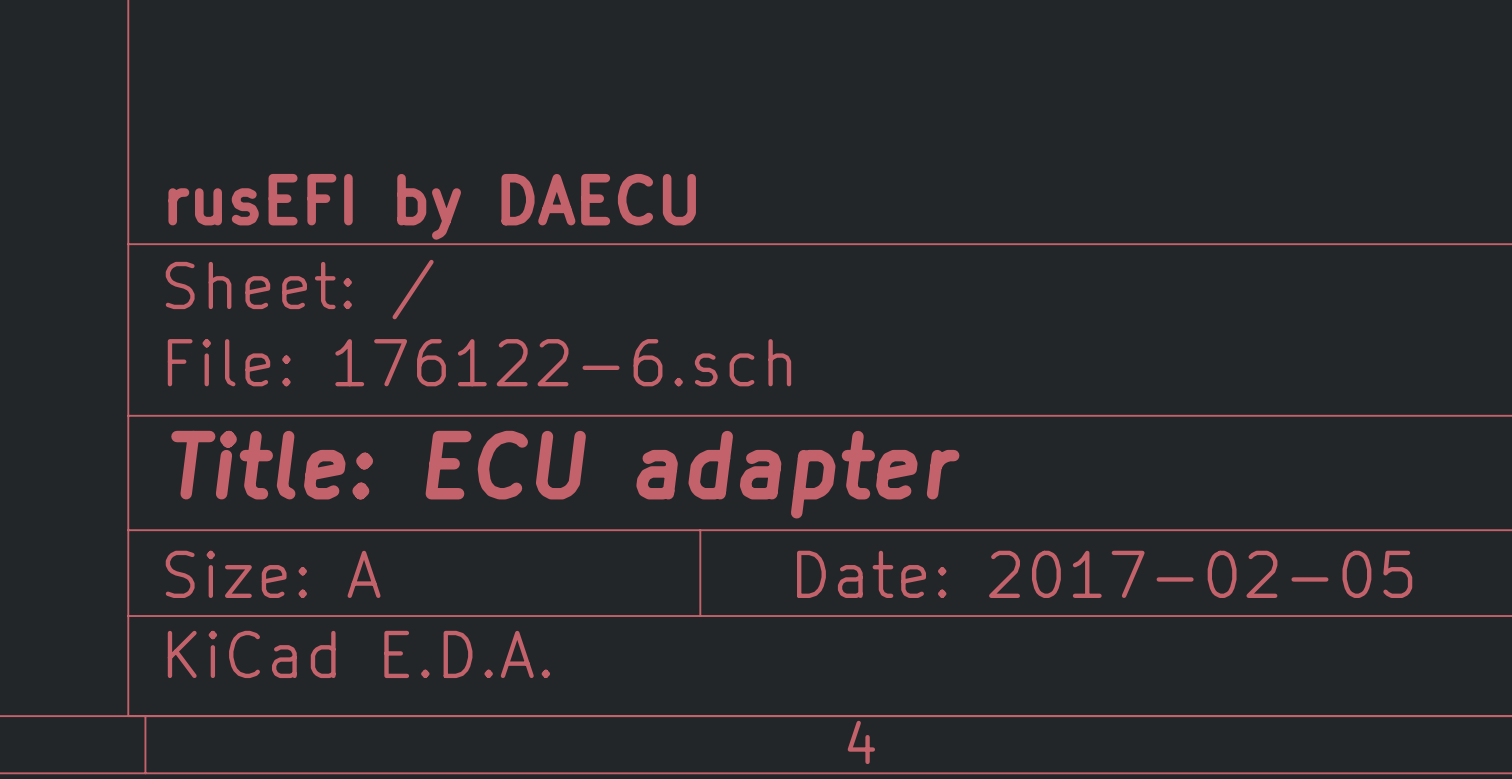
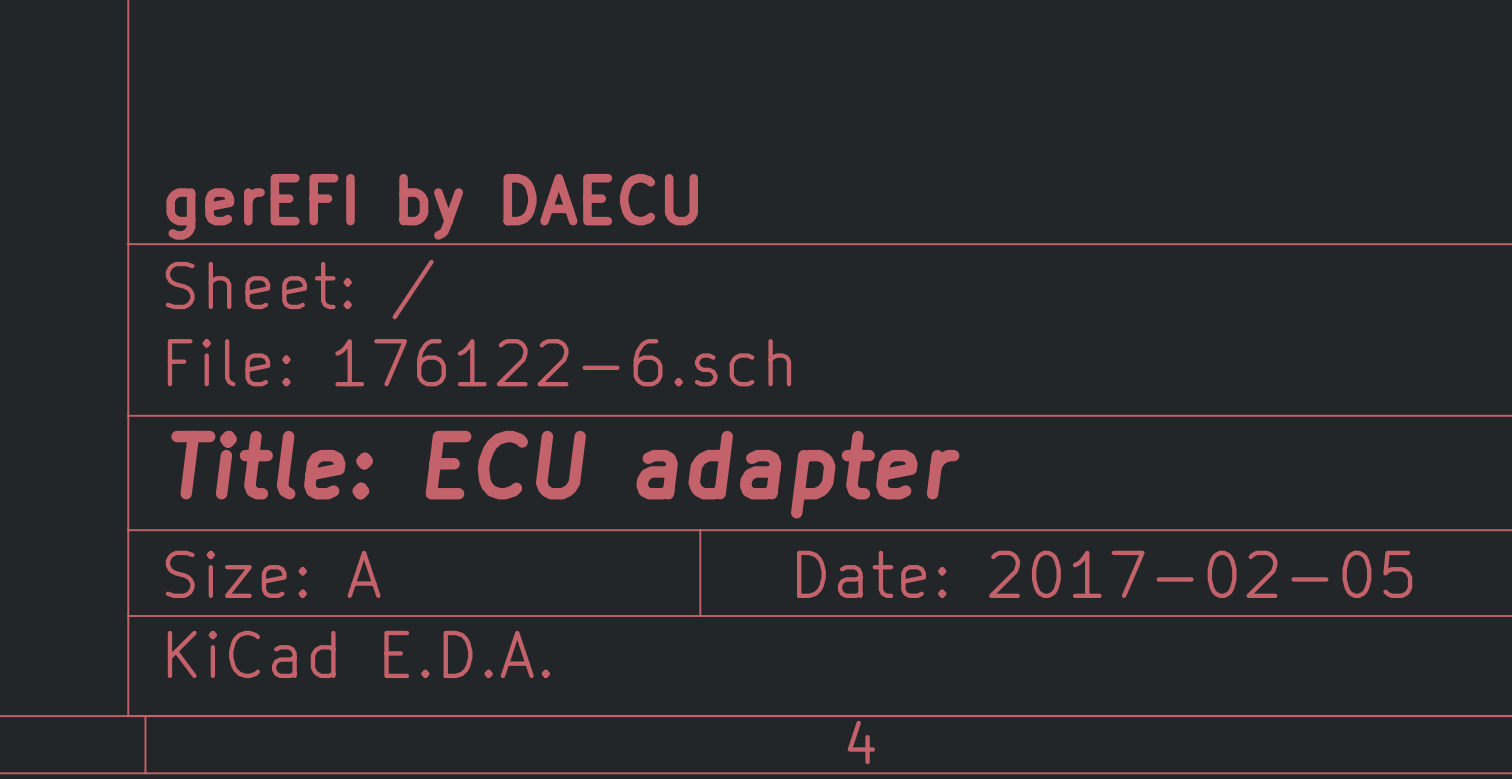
title block: rusEFI by DAECU (432, 206) -> gerEFI by DAECU (432, 206)

